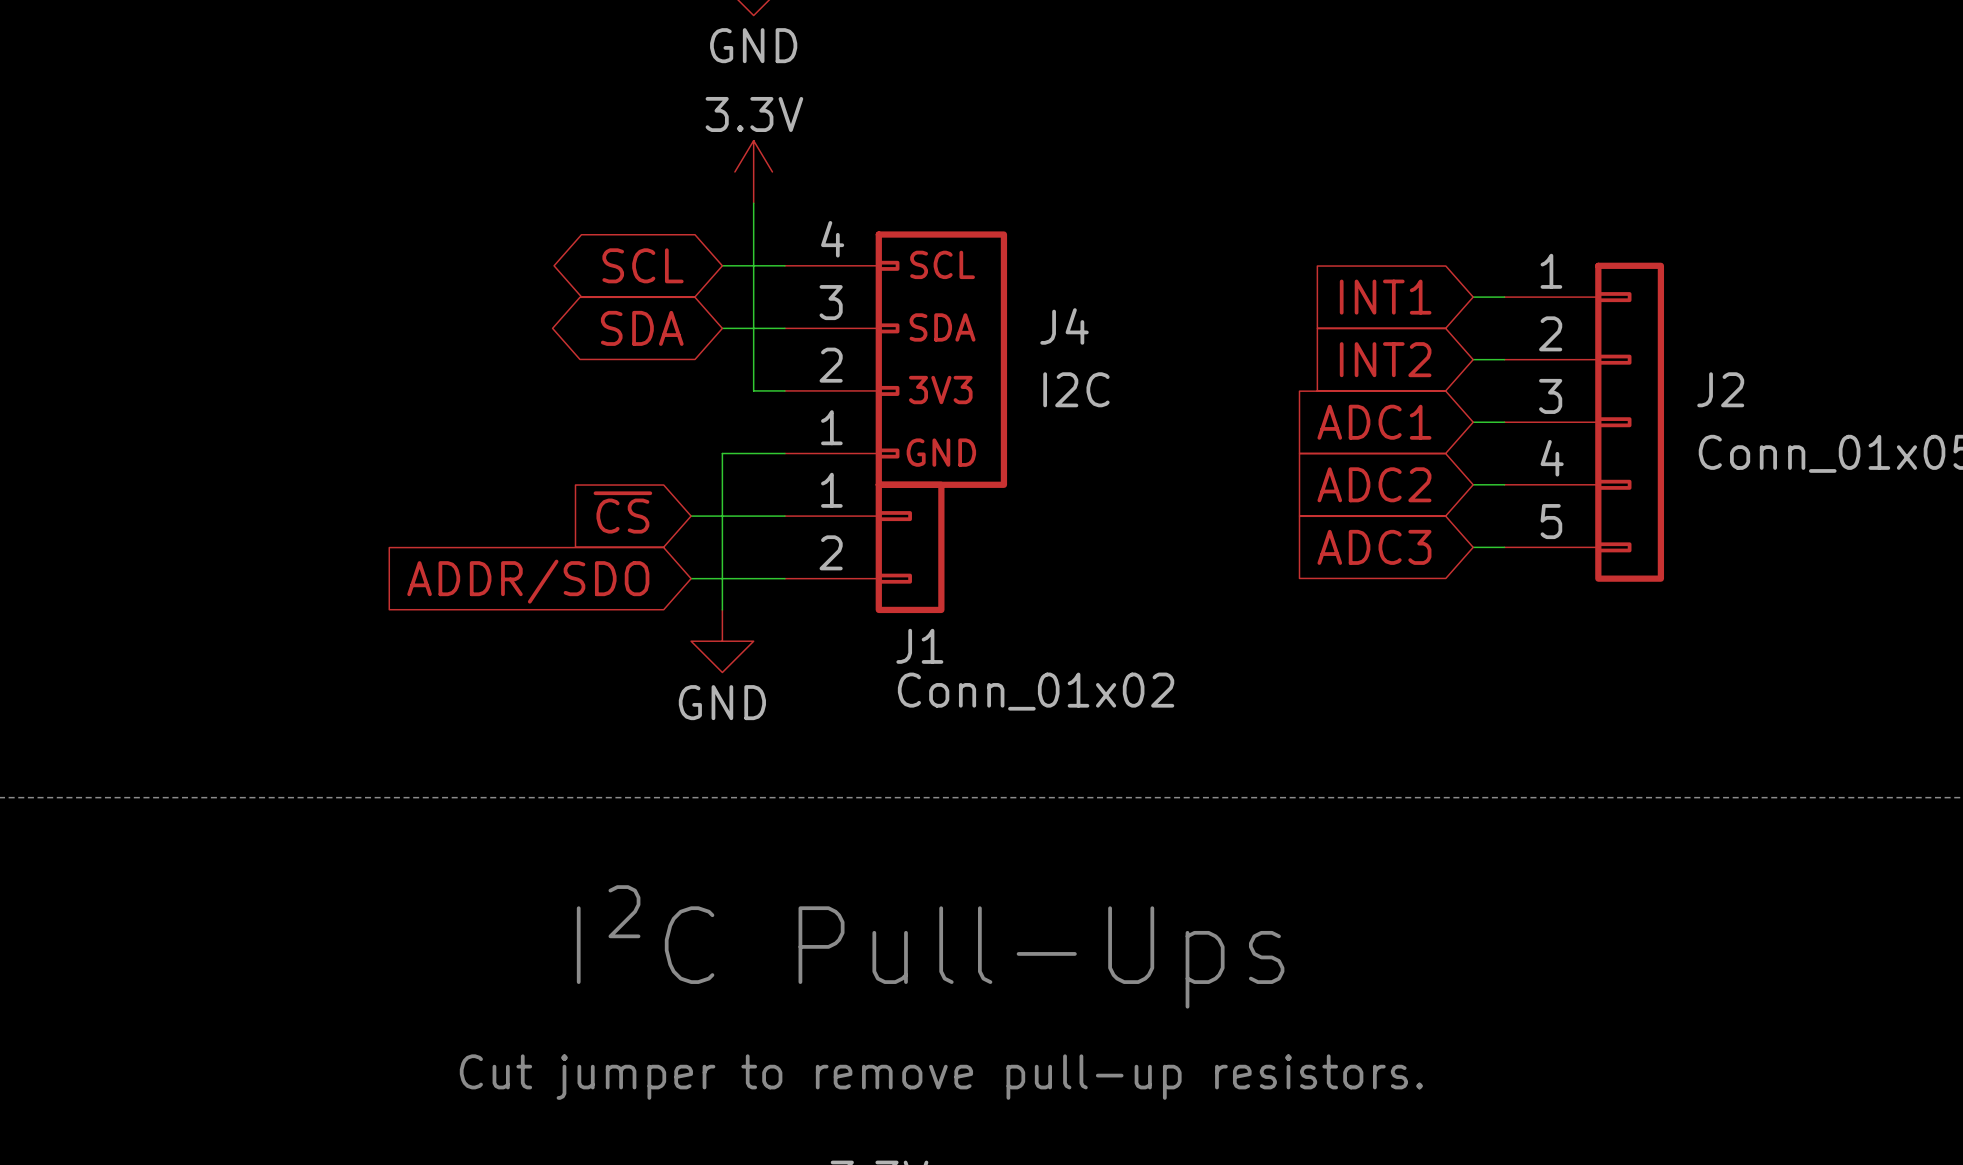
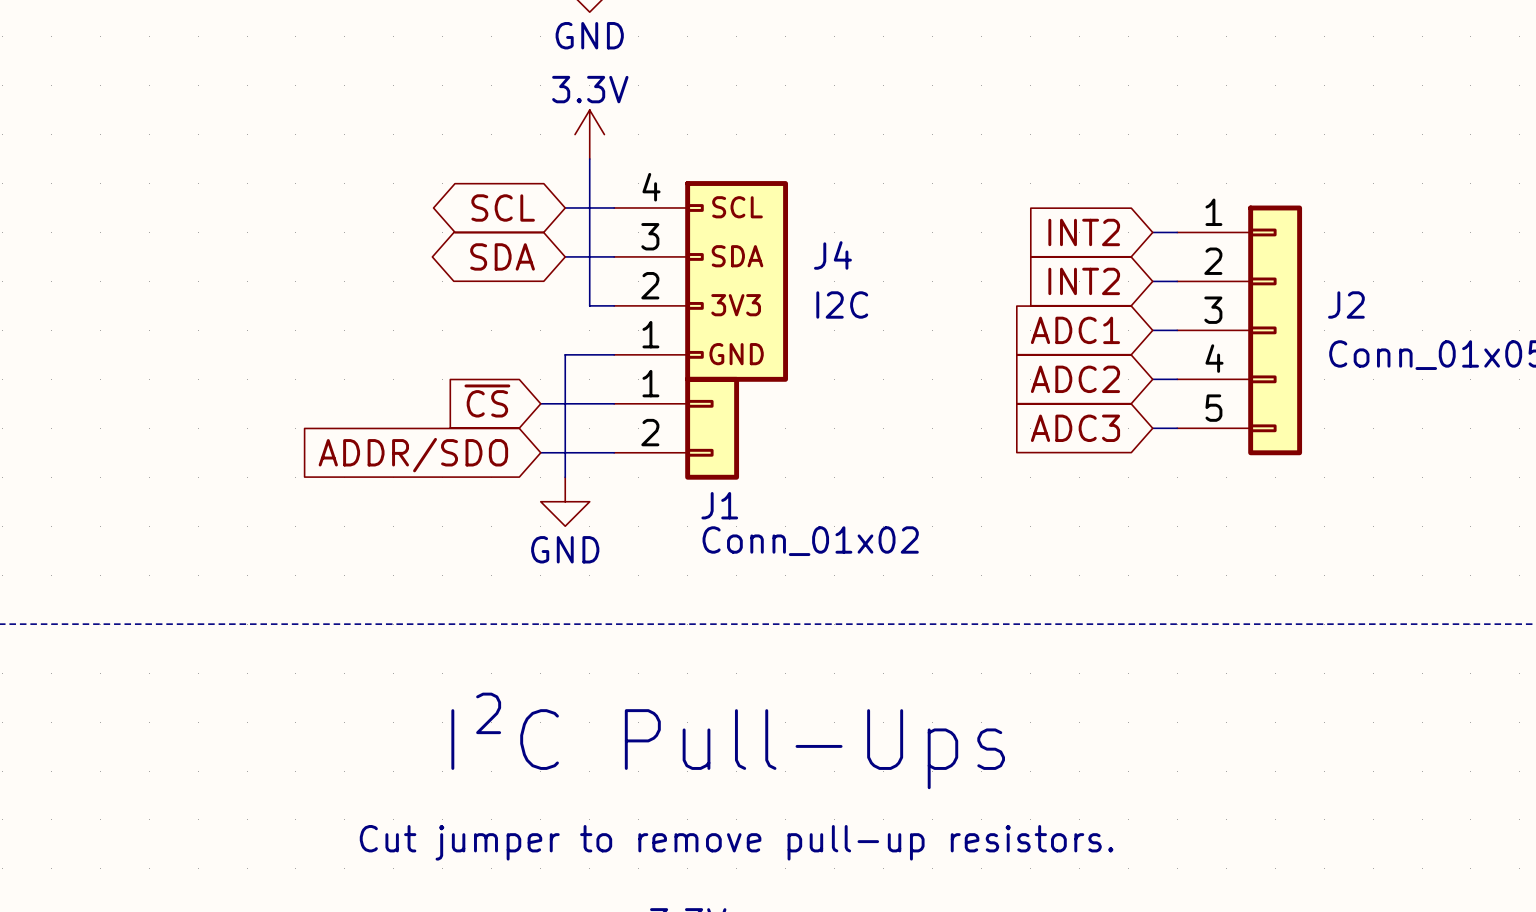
global label: INT1 (1385, 297) -> INT2 (1084, 232)

